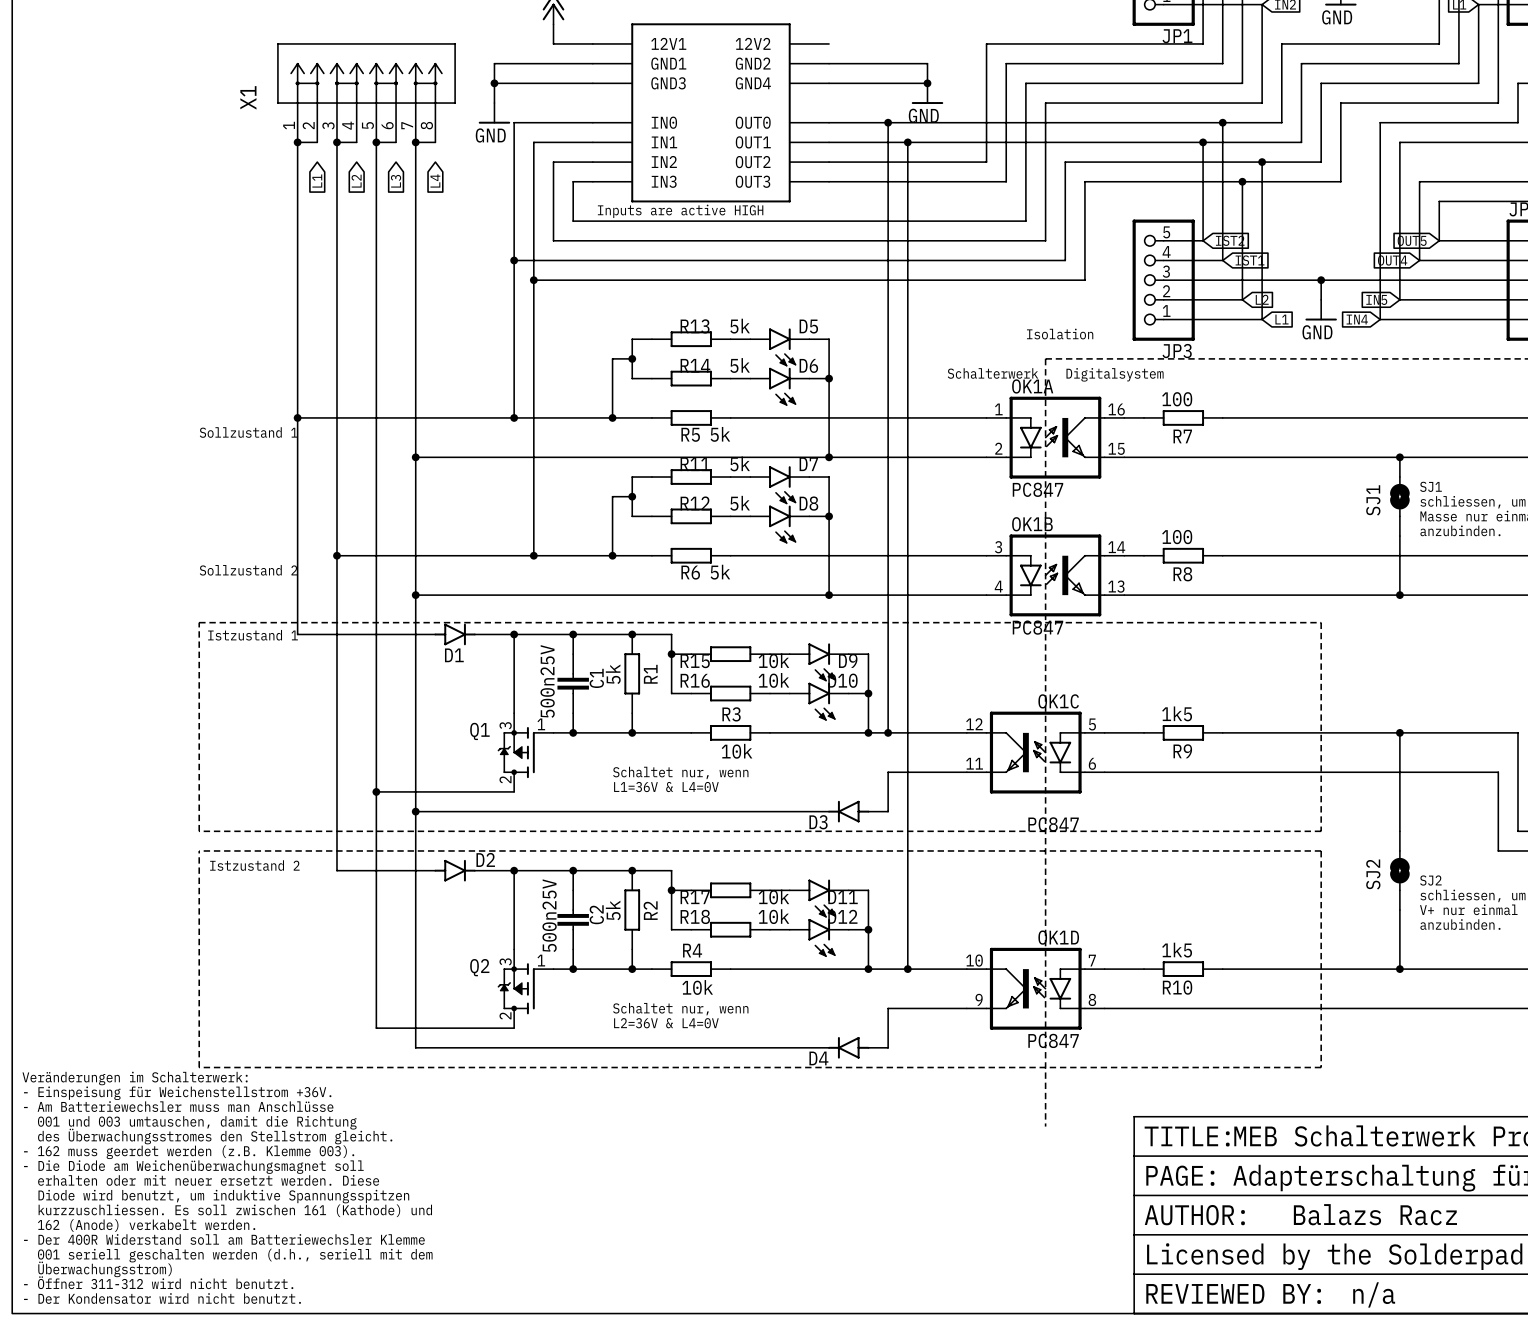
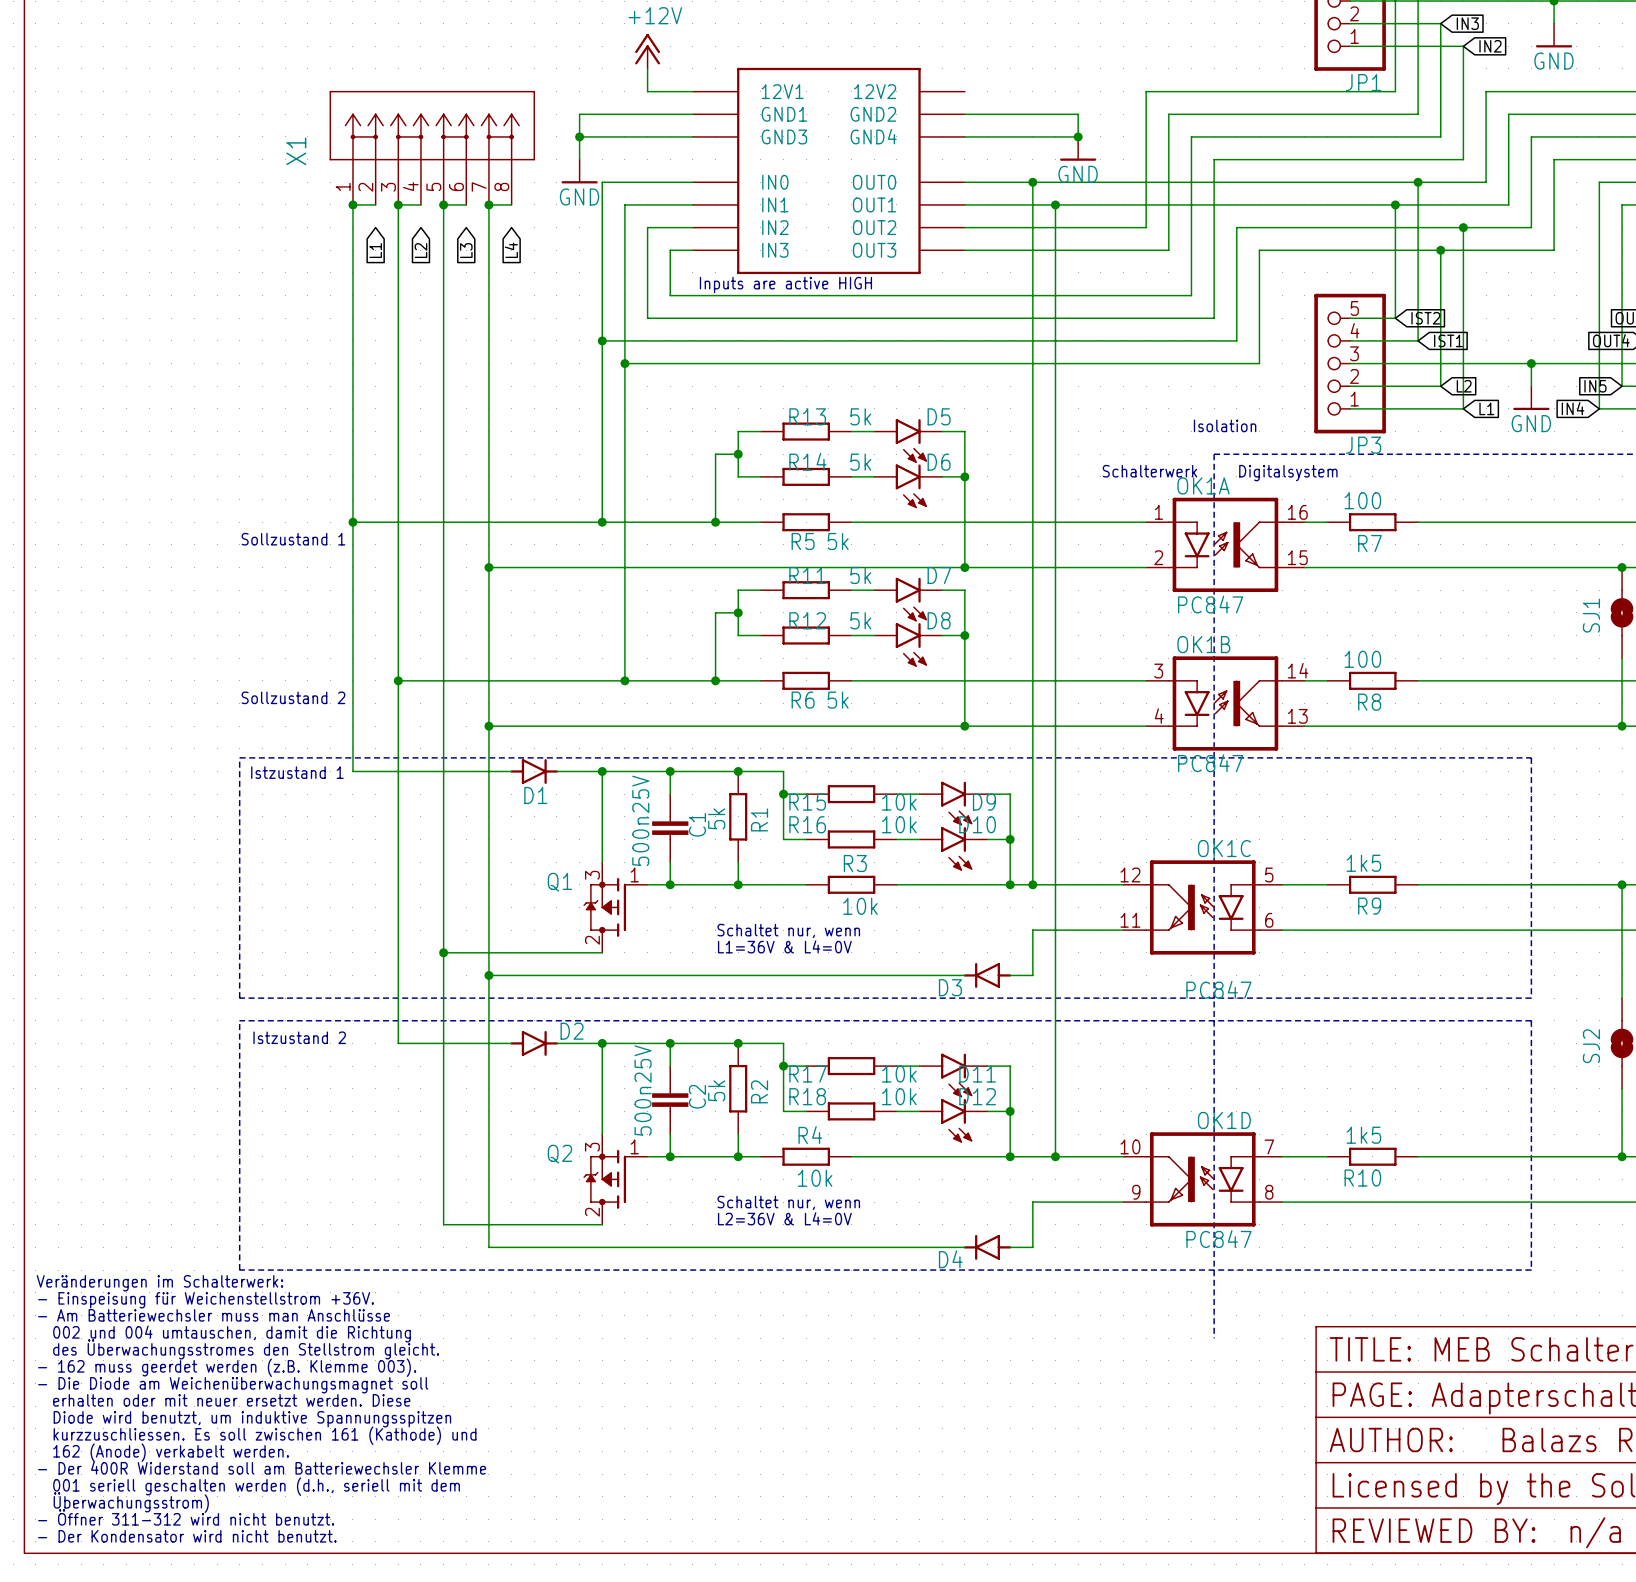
text: 001 und 003 umtauschen, damit die Richtung (197, 1122) -> 002 und 004 umtauschen, damit die Richtung (232, 1333)

